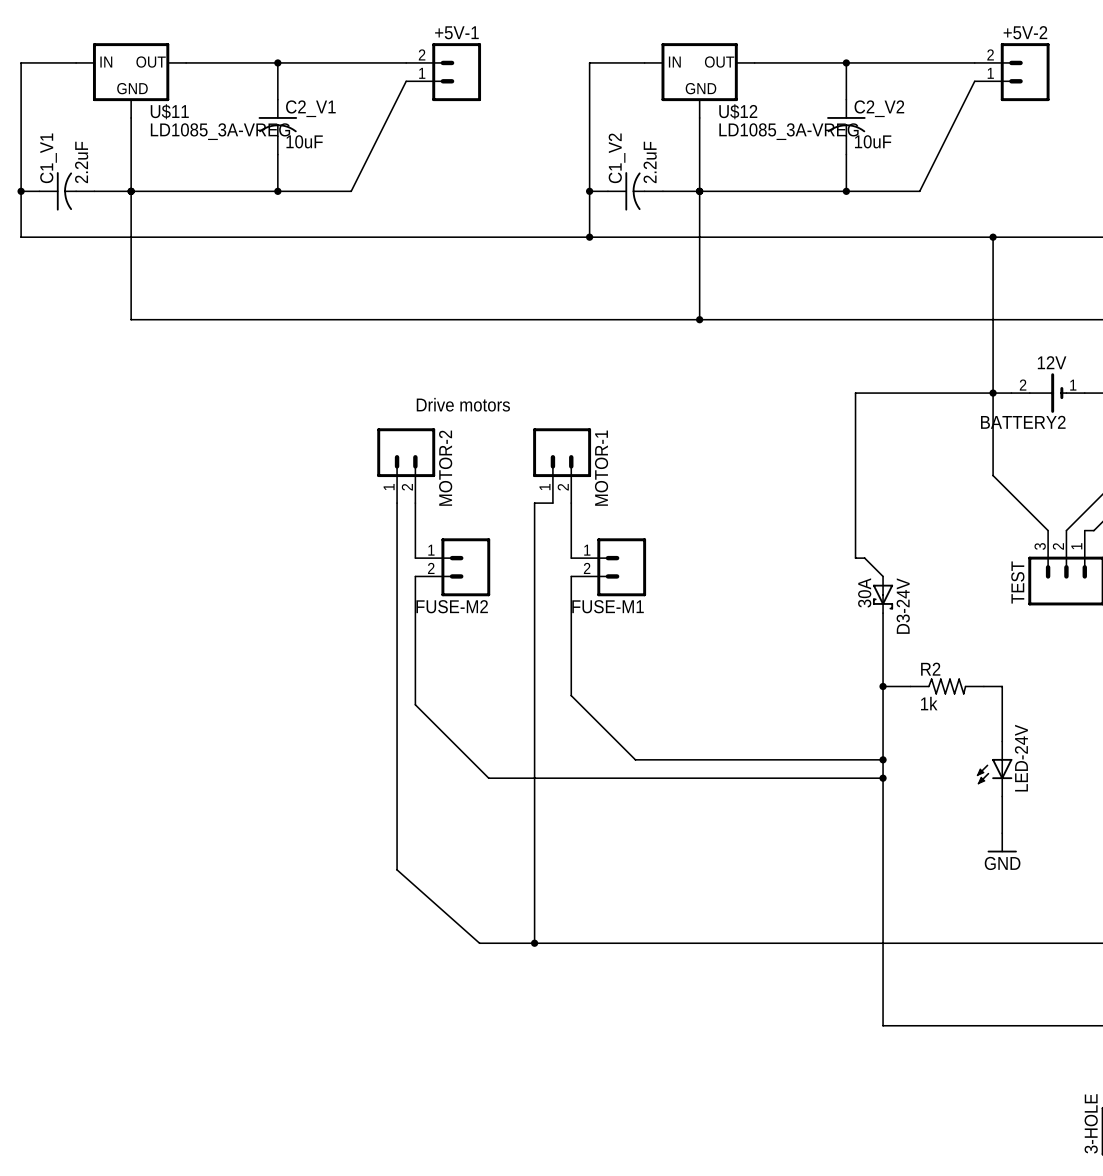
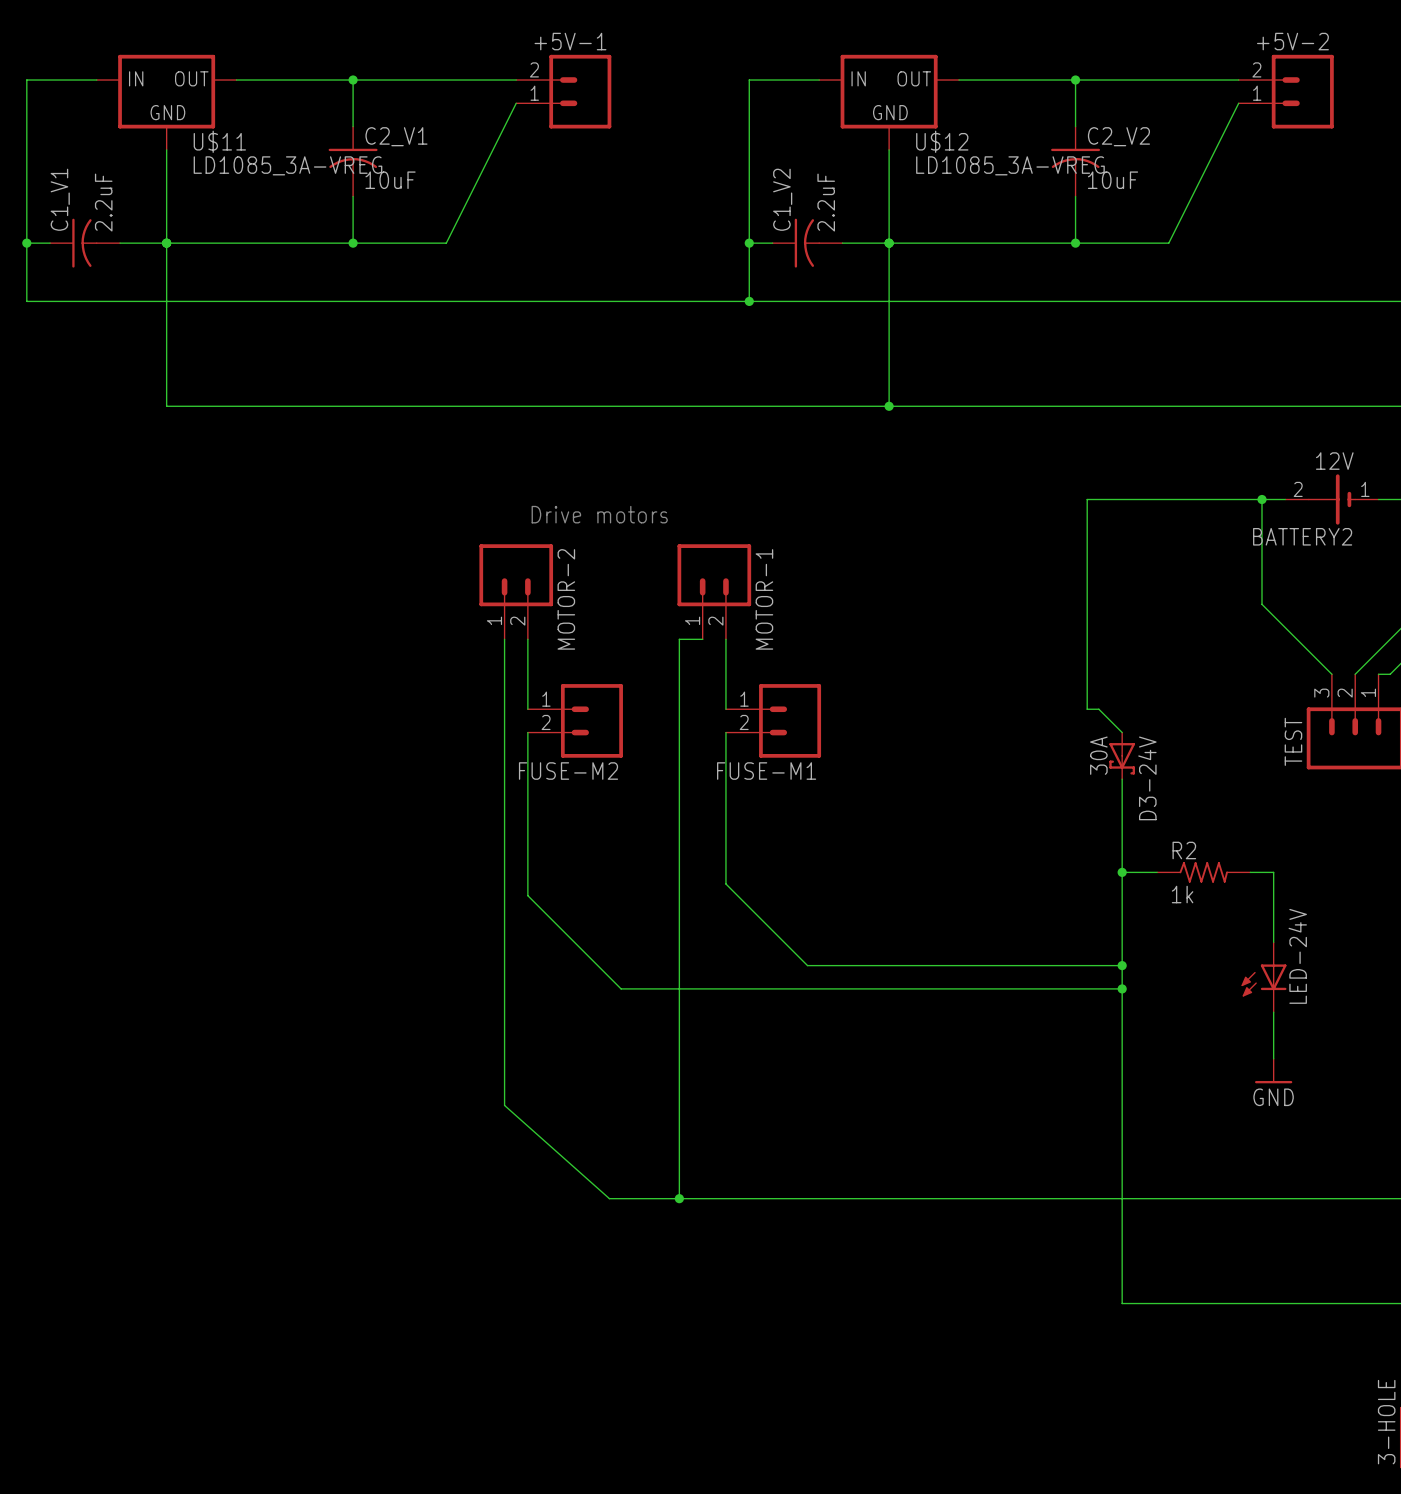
wire: (993, 237) (993, 393) -> none
junction: (993, 237) -> none

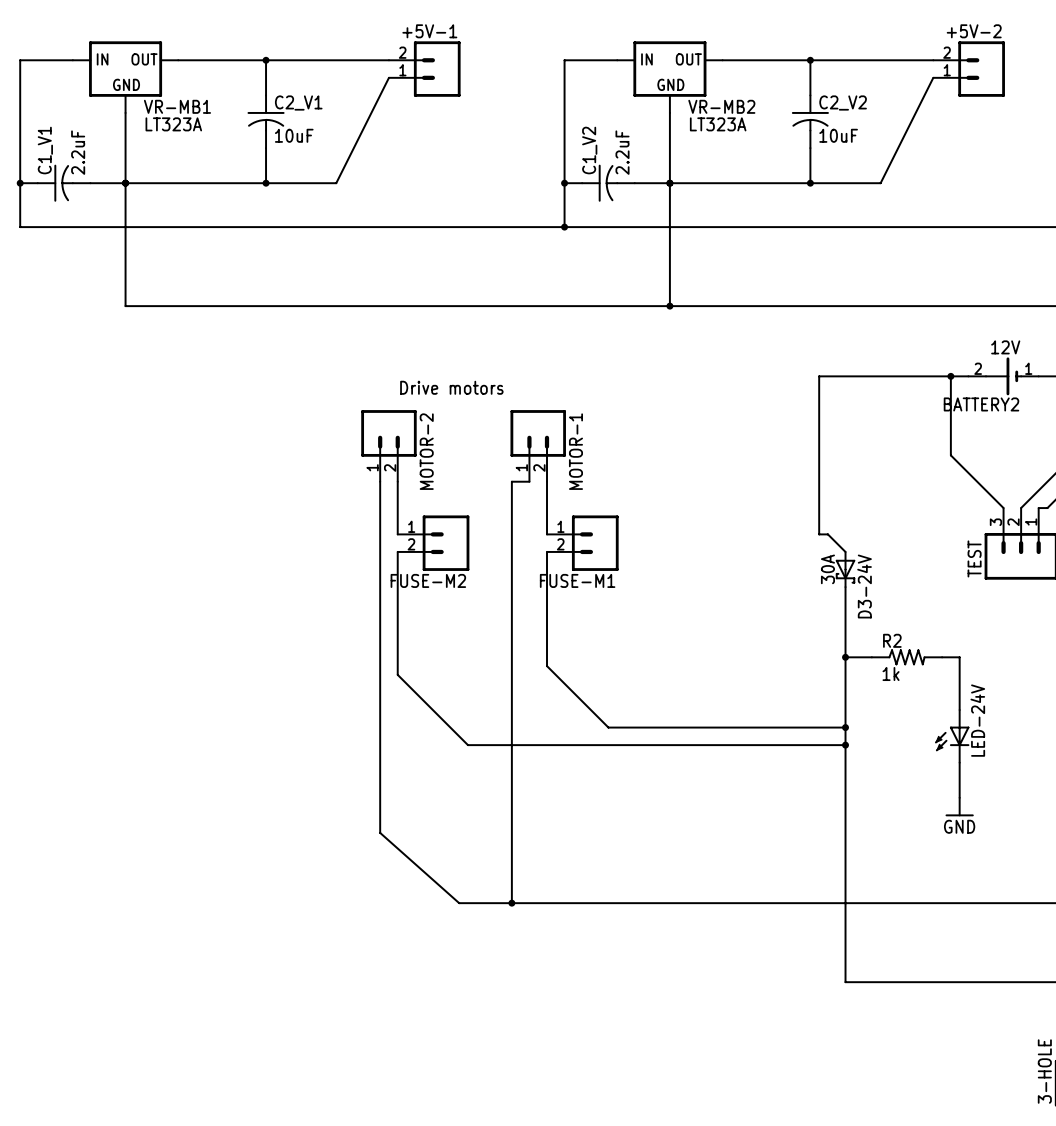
U$11 name: U$11 (219, 141) -> VR-MB1 (177, 106)
U$12 name: U$12 (942, 141) -> VR-MB2 (721, 106)
U$11 value: LD1085_3A-VREG (287, 165) -> LT323A (173, 124)
U$12 value: LD1085_3A-VREG (1010, 165) -> LT323A (718, 124)

